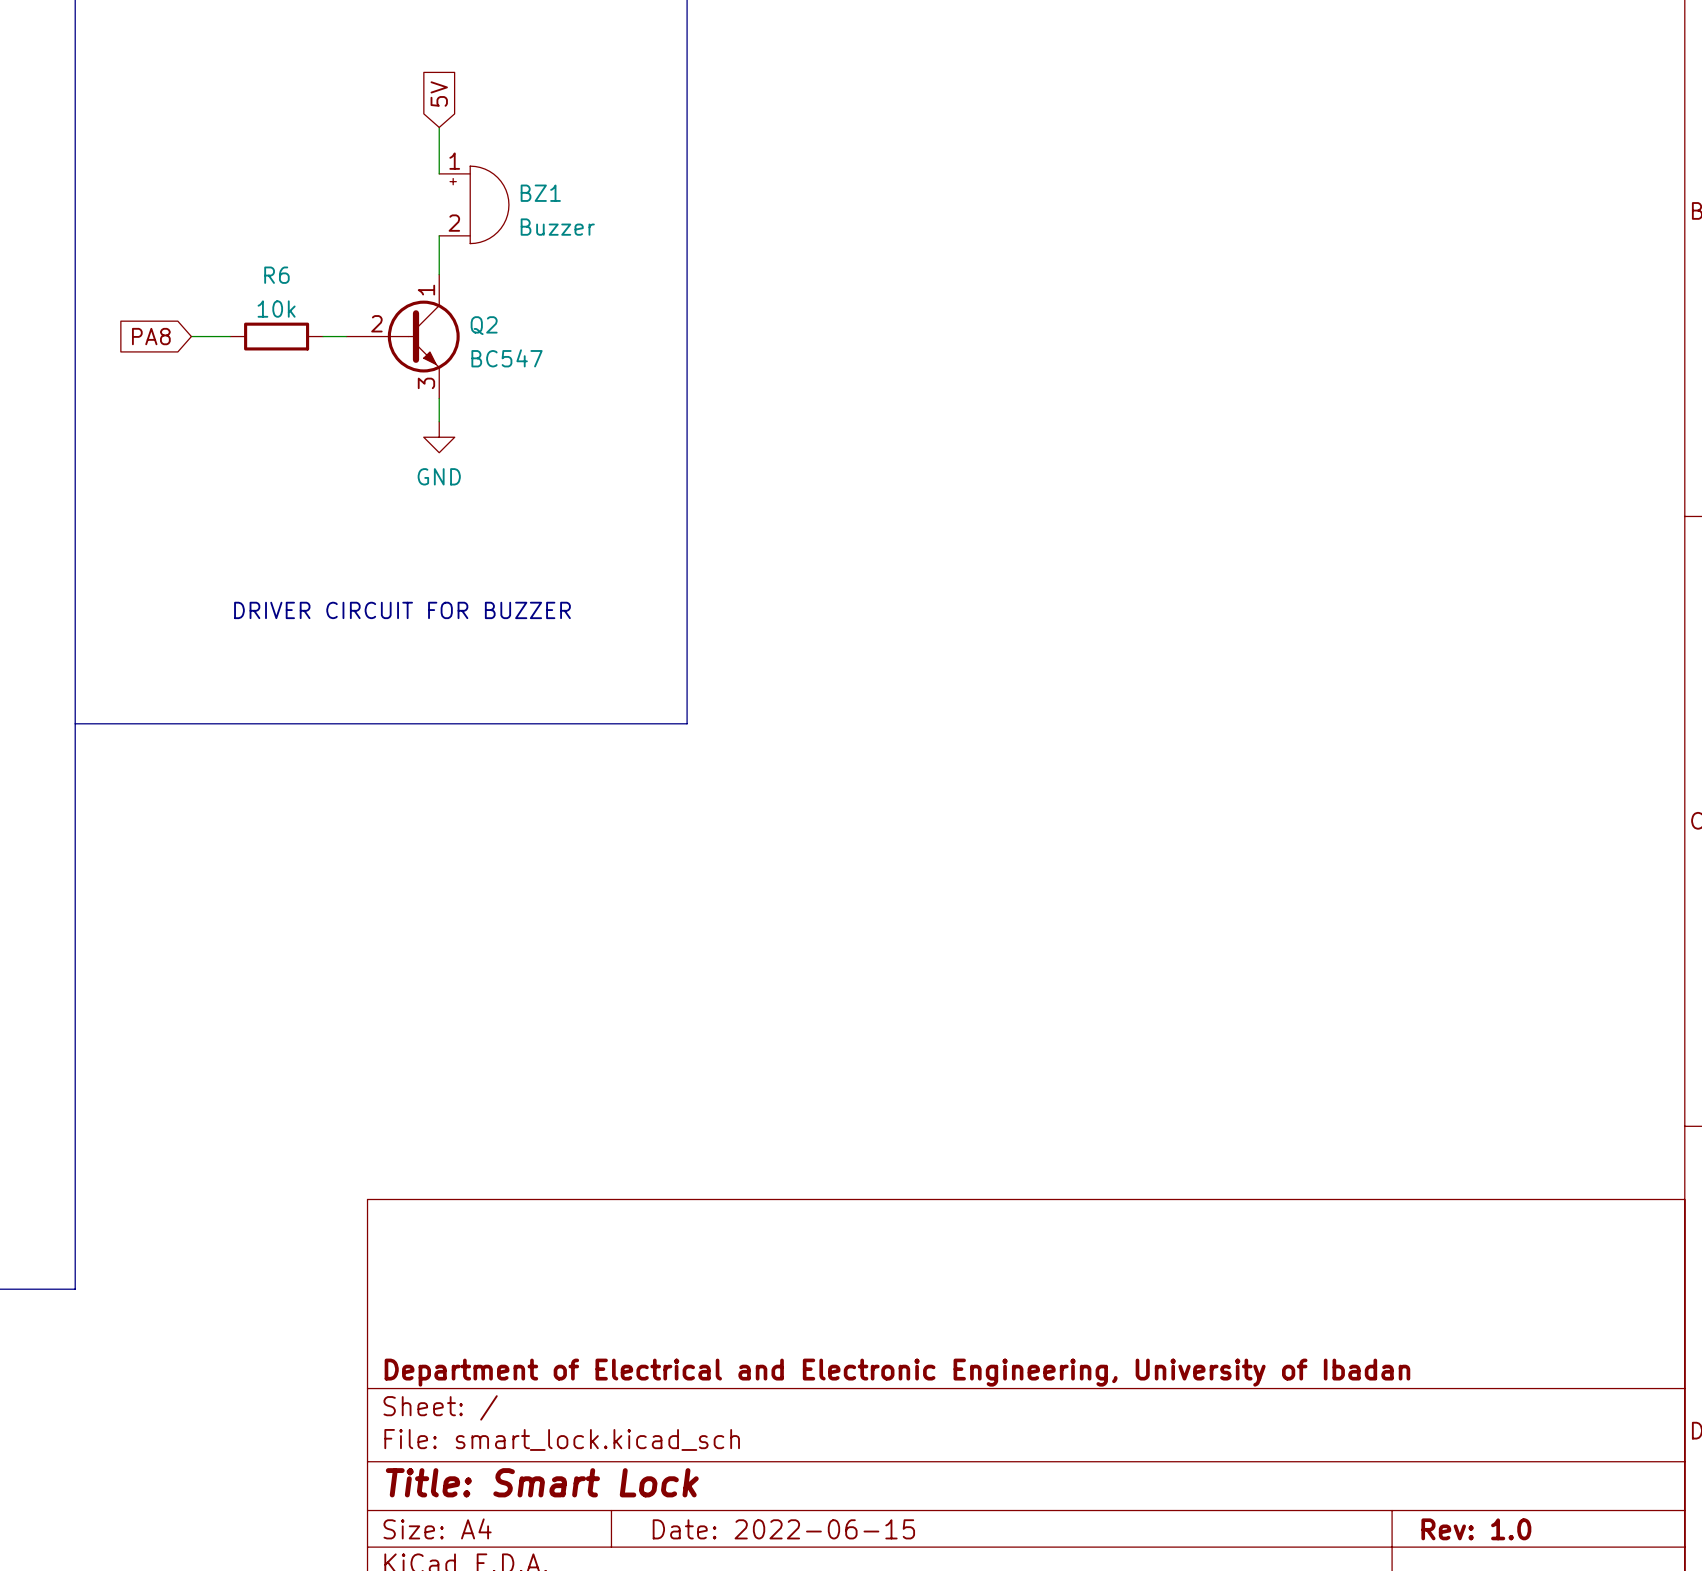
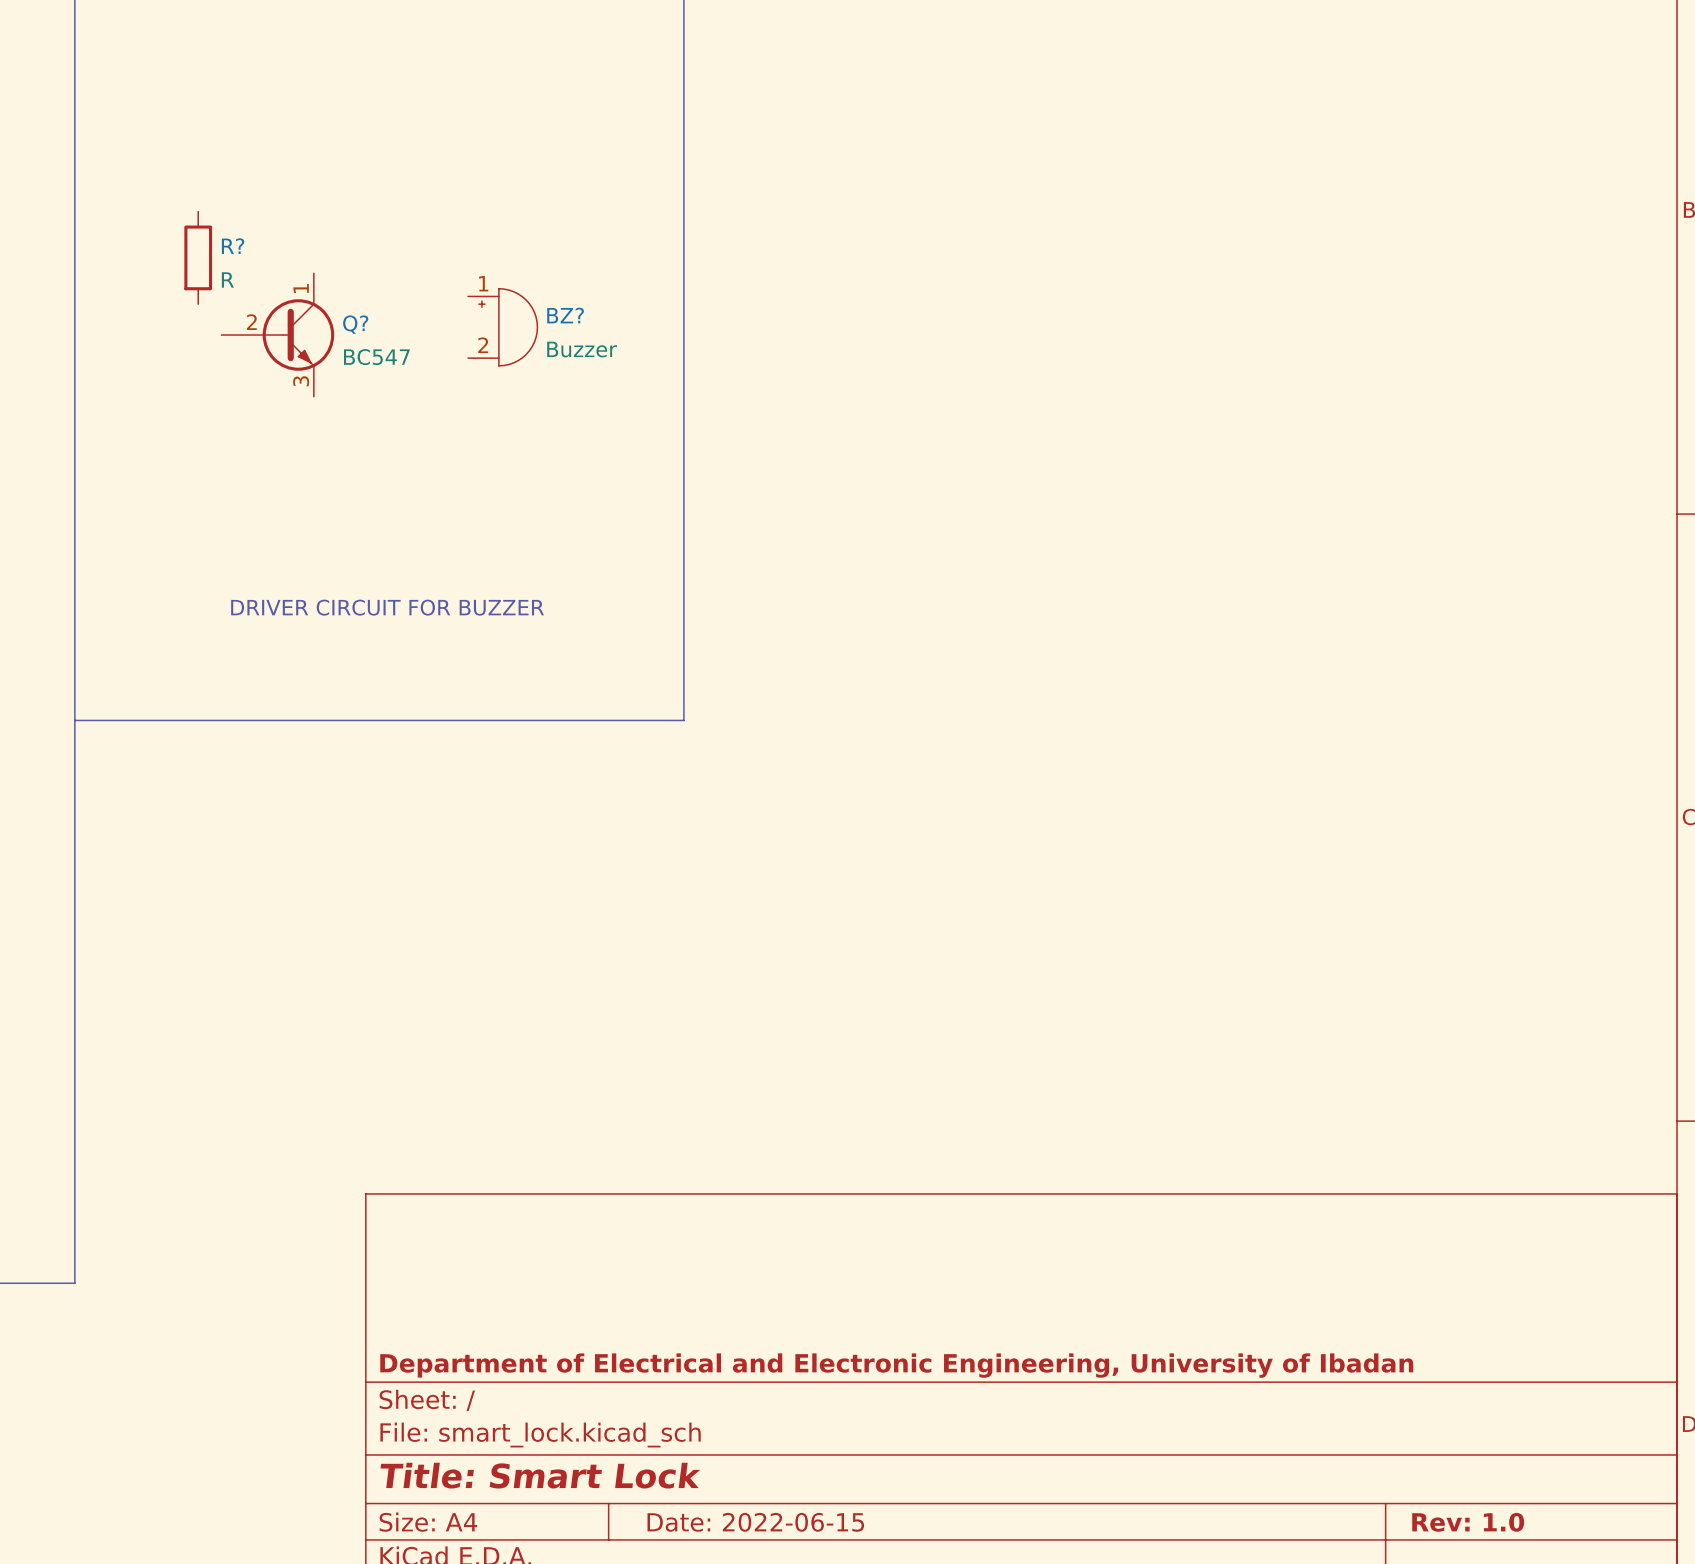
global label: 5V (439, 94) -> none
wire: (439, 127) (439, 173) -> none
BZ1: Buzzer (474, 204) -> none
wire: (439, 235) (439, 274) -> none
R?: none -> R (198, 257)
BZ?: none -> Buzzer (502, 327)
global label: PA8 (151, 336) -> none
wire: (191, 336) (230, 336) -> none
R6: 10k (276, 336) -> none
Q?: none -> BC547 (277, 334)
wire: (323, 336) (346, 336) -> none
Q2: BC547 (402, 336) -> none
wire: (439, 398) (439, 421) -> none
power symbol: GND (439, 437) -> none

